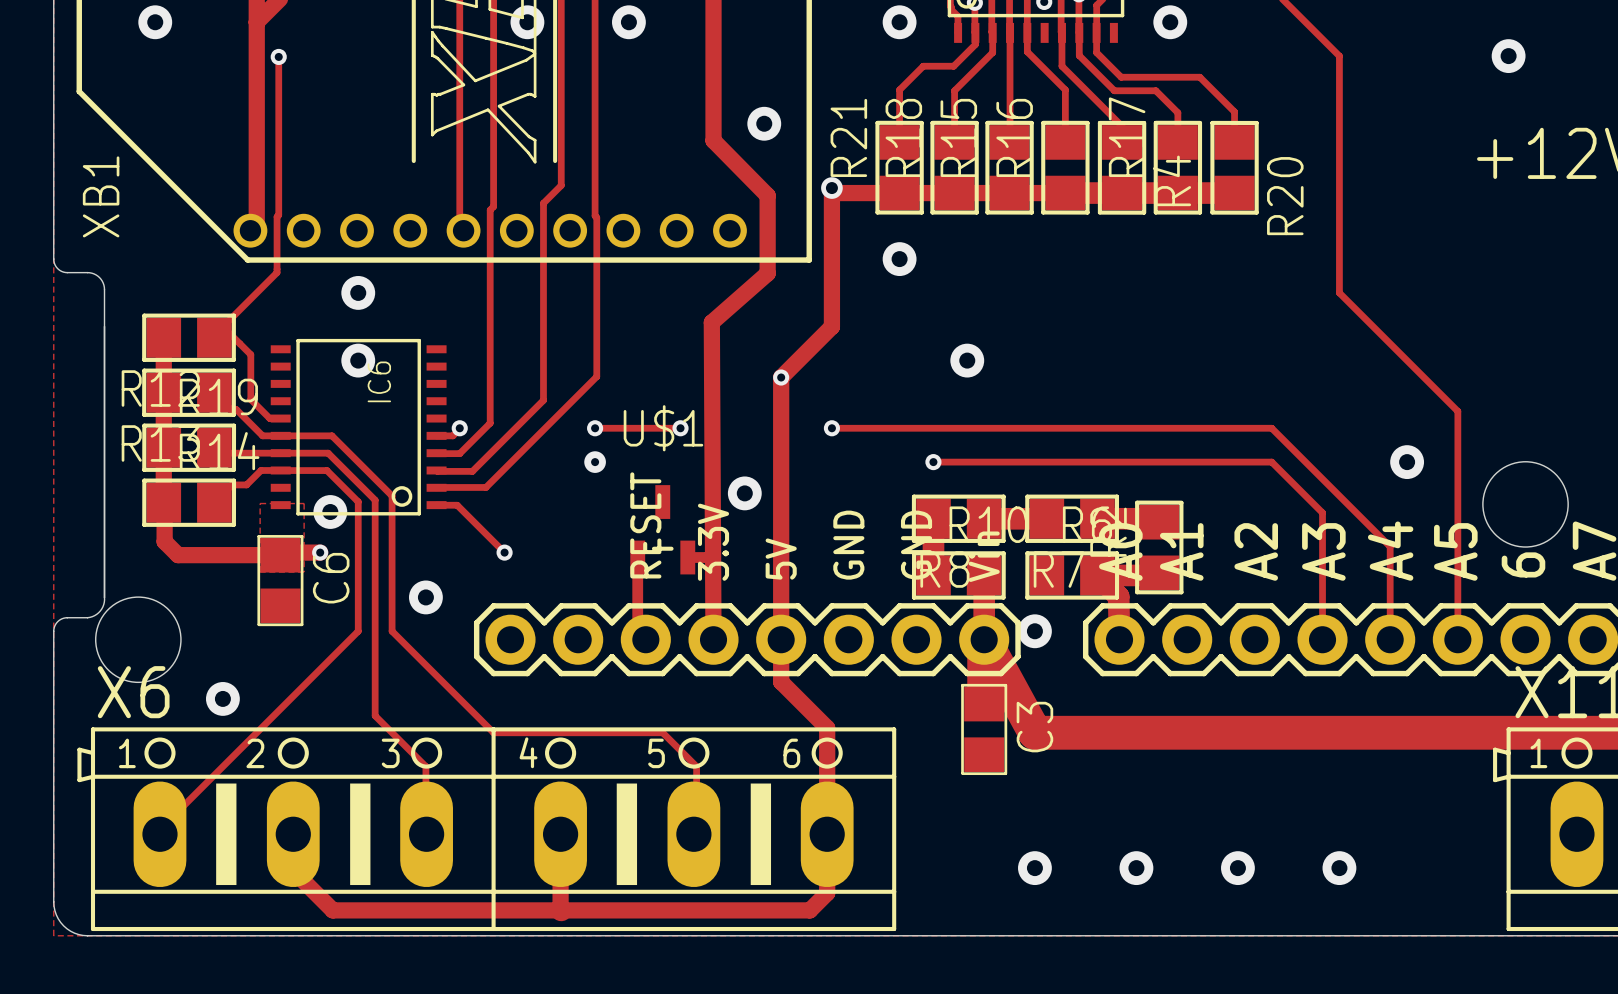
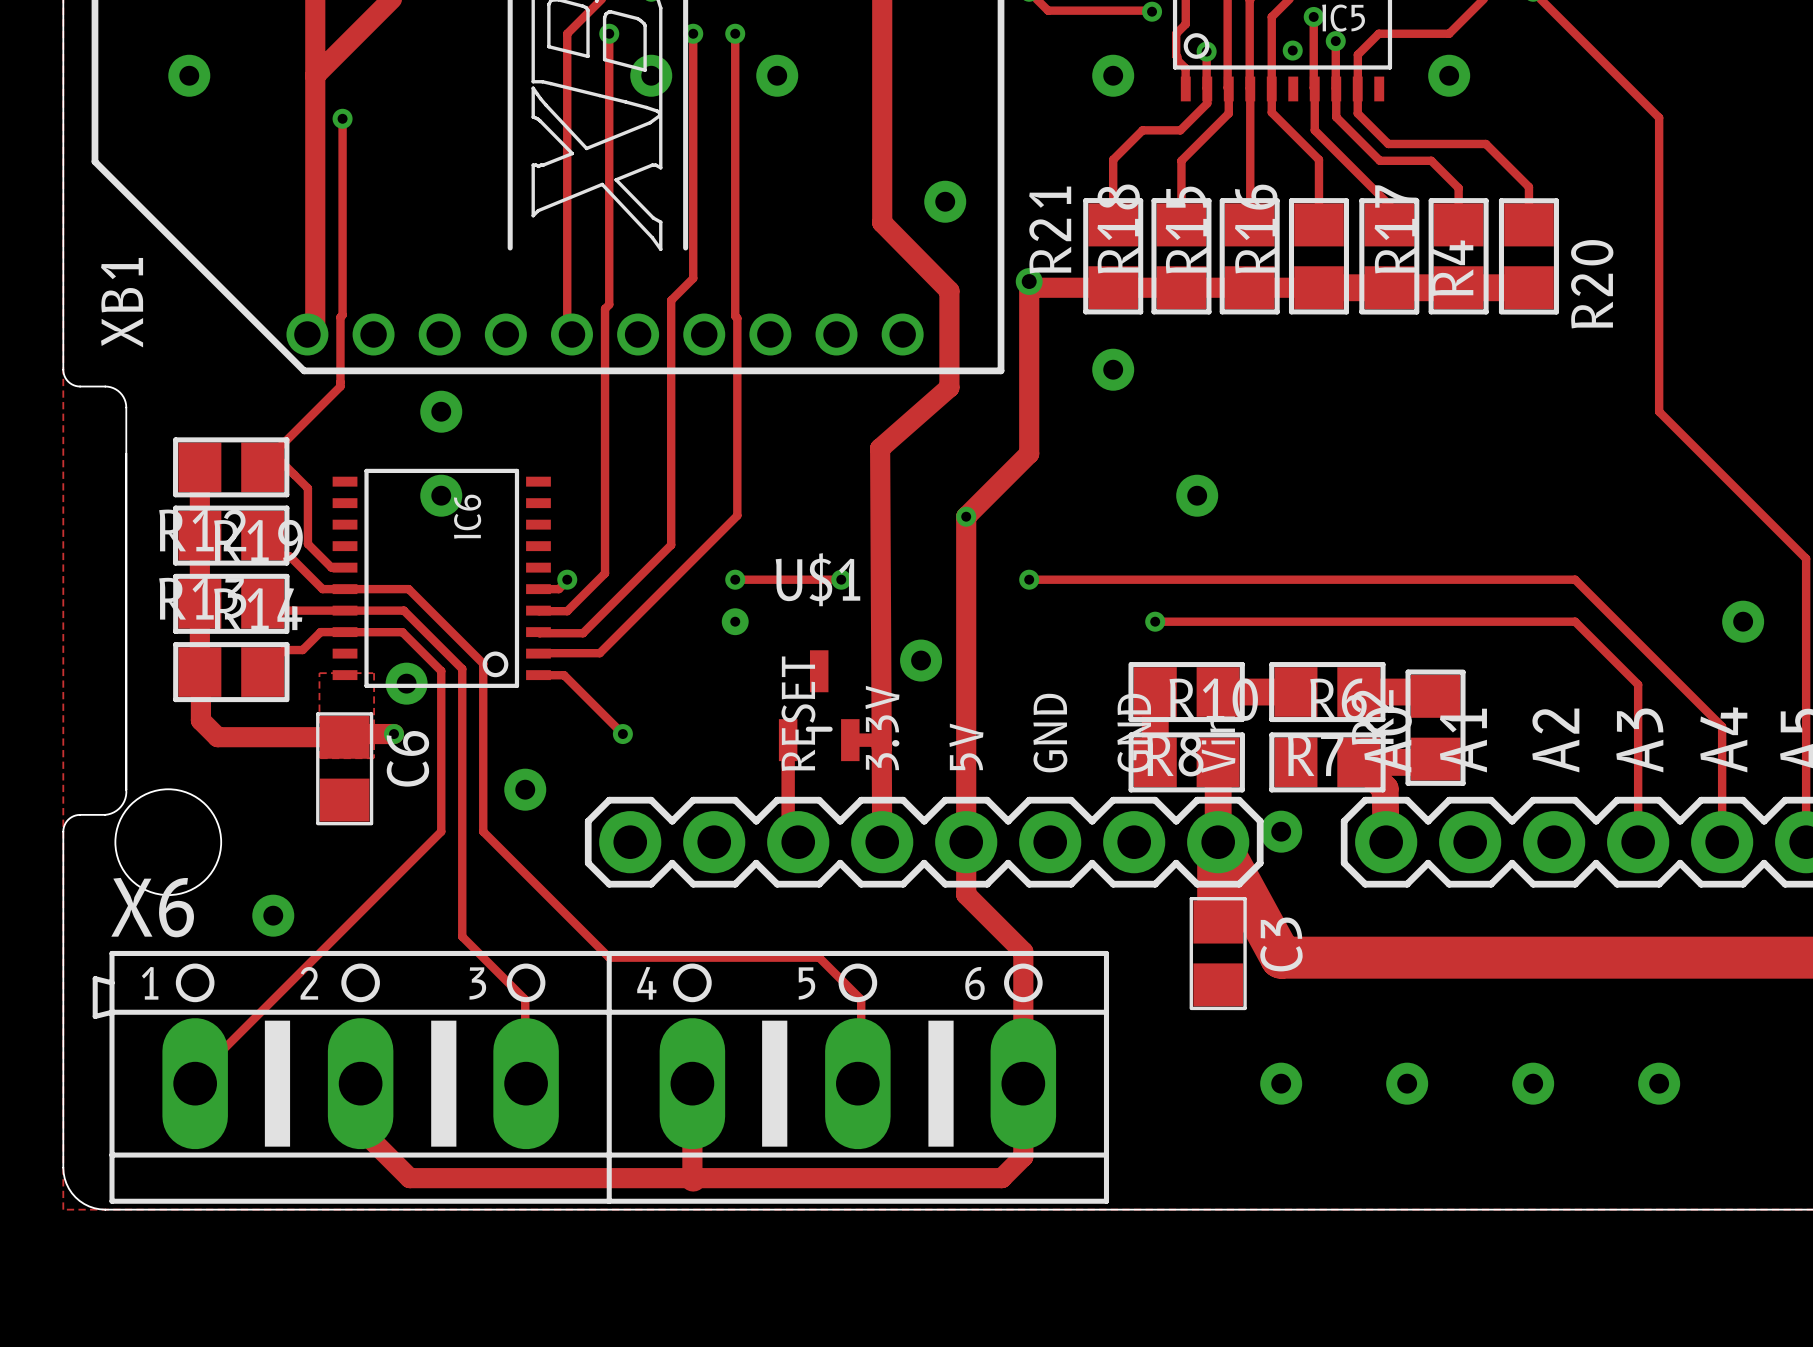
via position: (1034, 868) -> (1281, 1083)
via position: (1136, 868) -> (1407, 1083)
via position: (1237, 868) -> (1533, 1083)
via position: (1339, 868) -> (1659, 1083)

